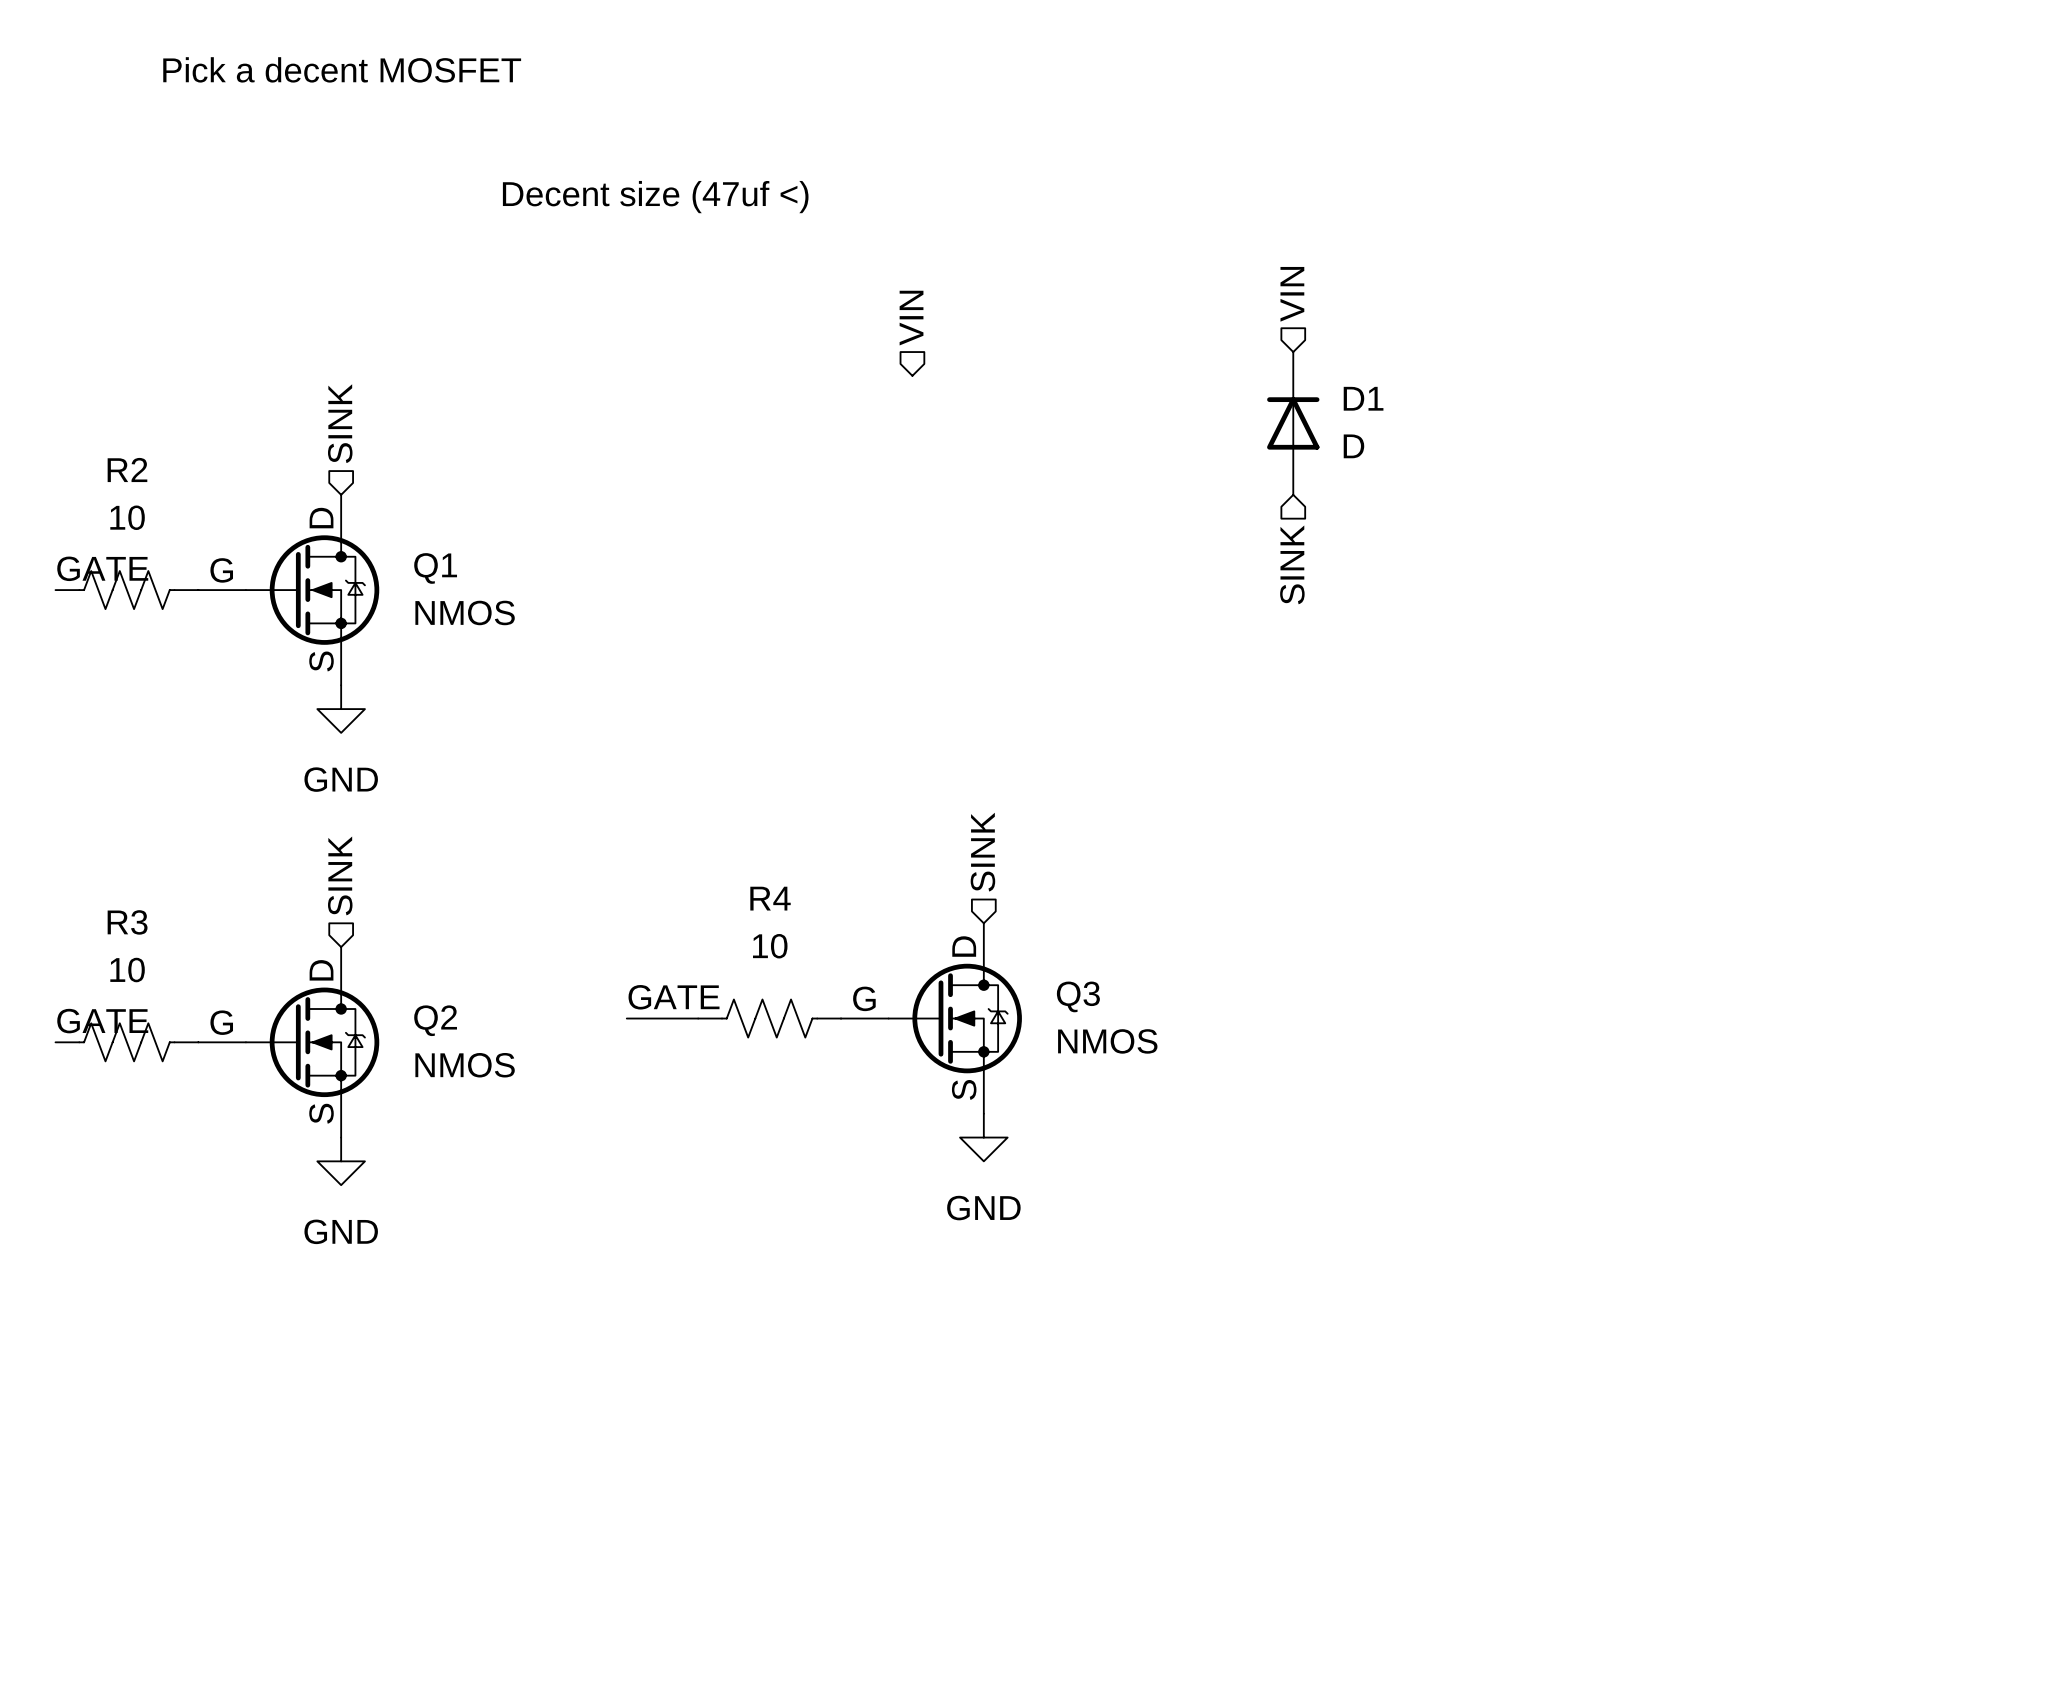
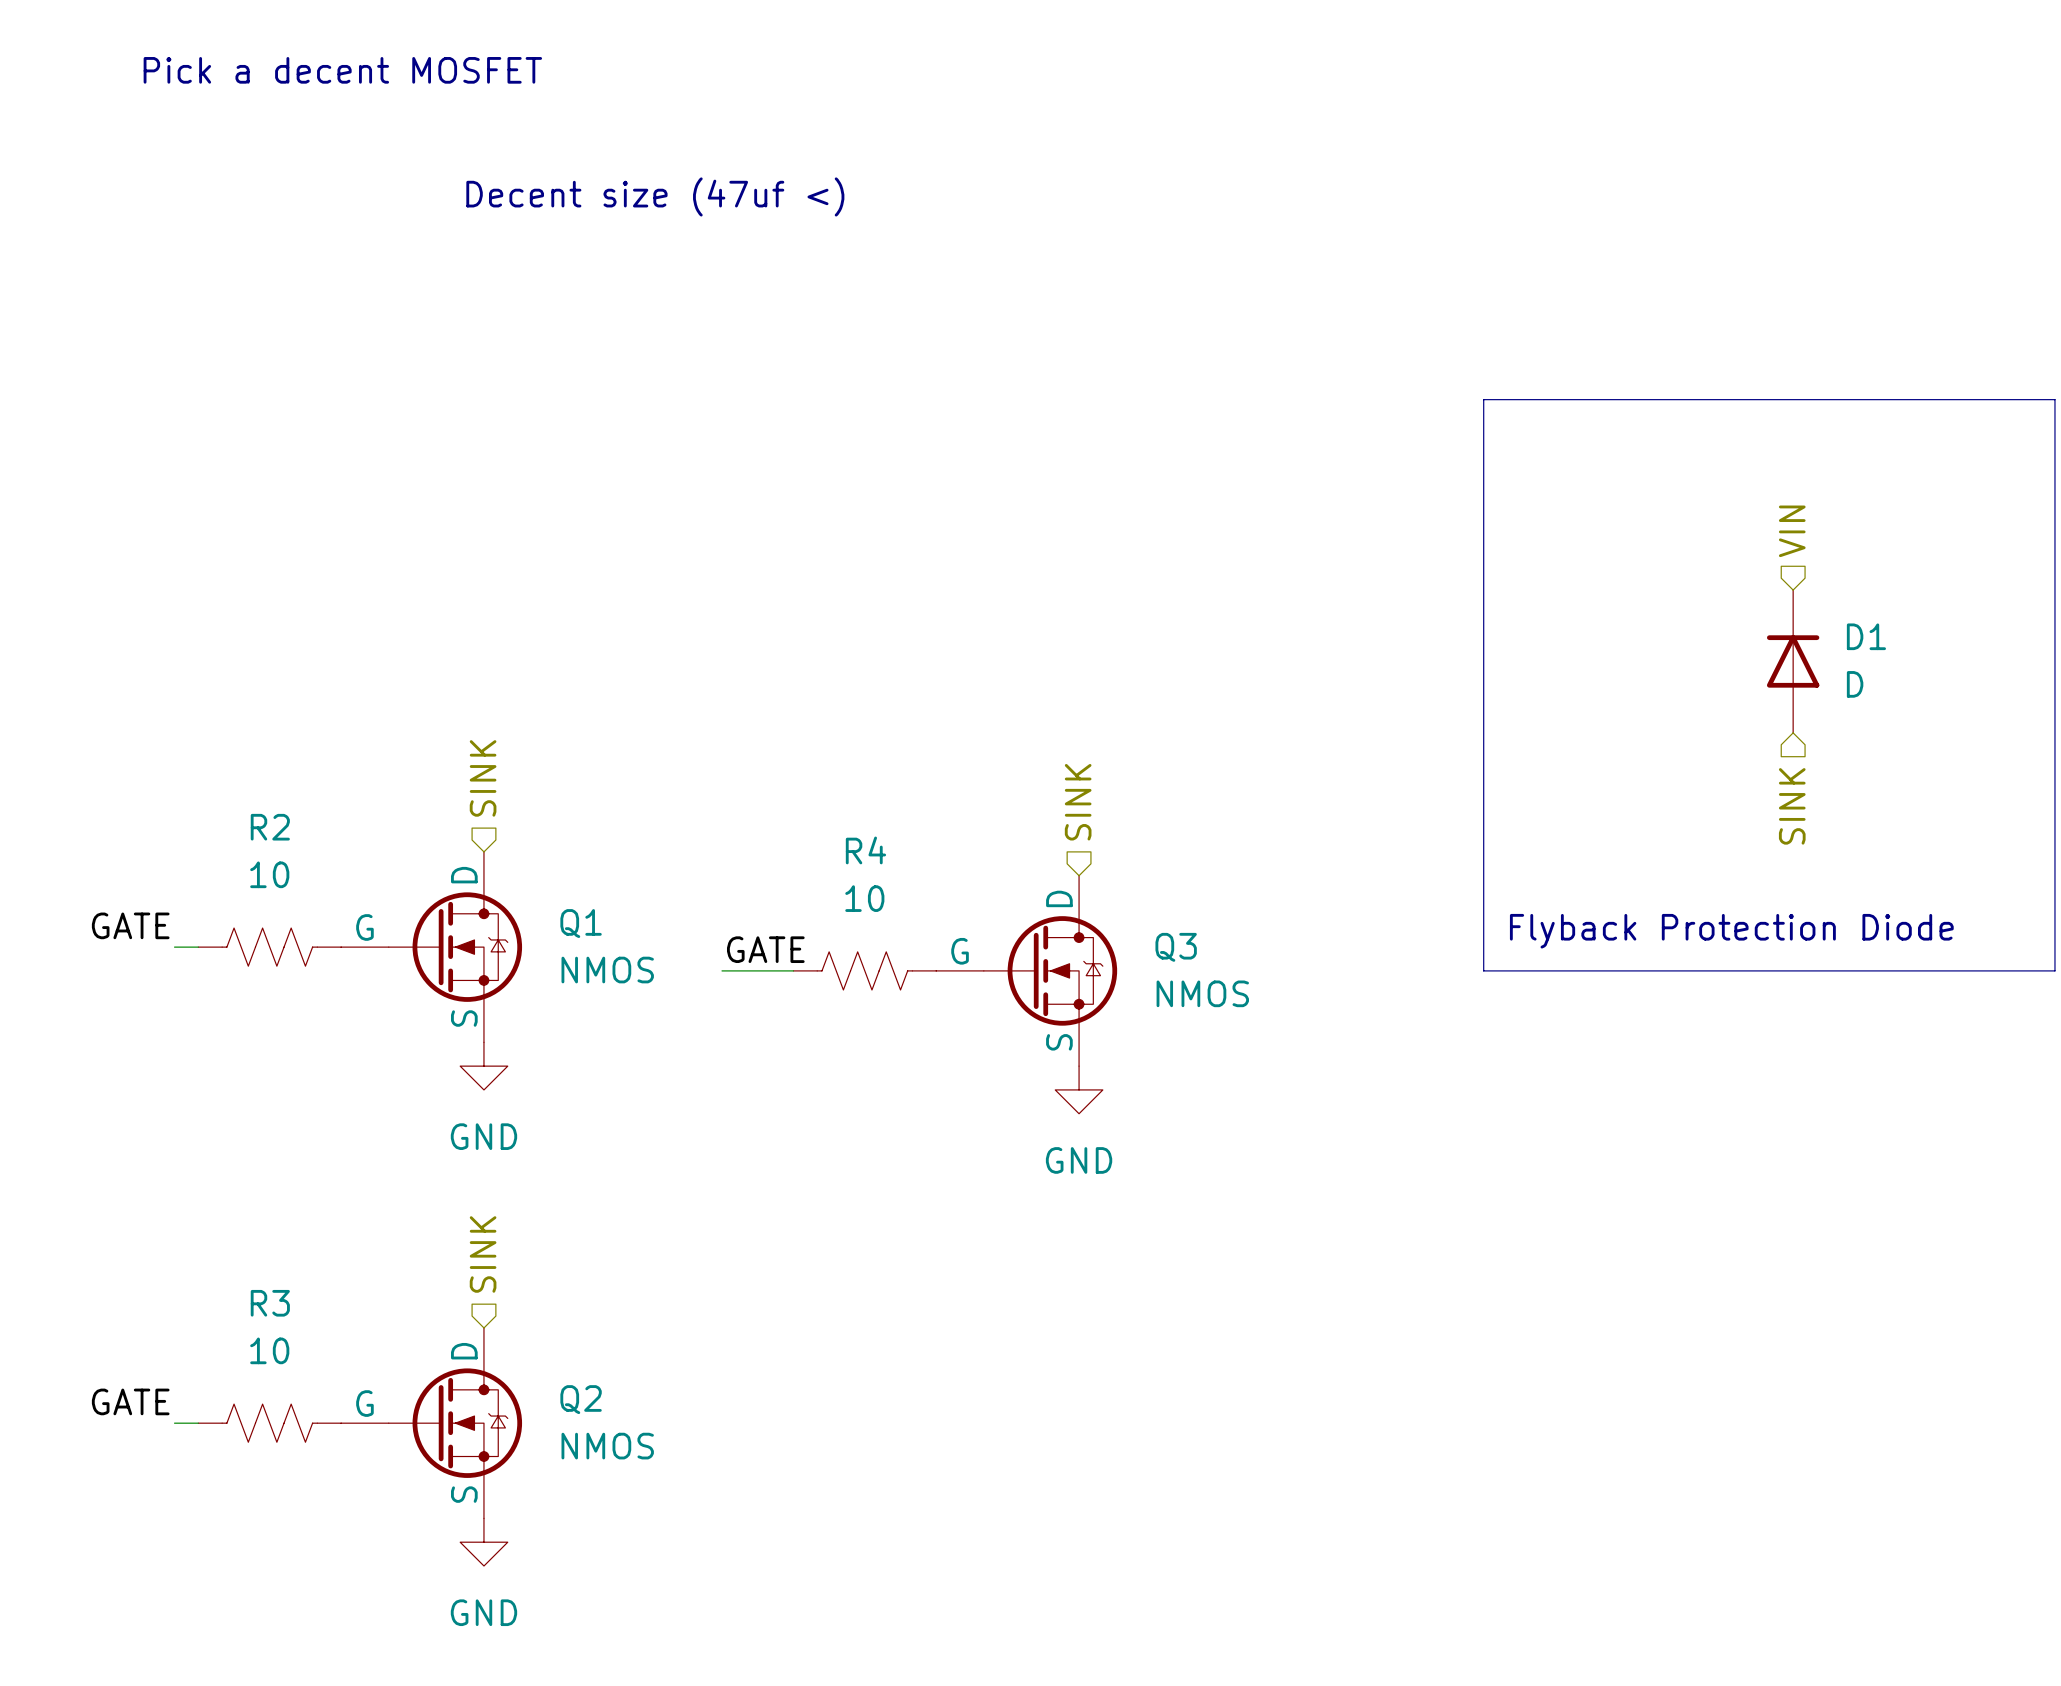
hierarchical label: VIN (1292, 294) -> none
hierarchical label: VIN (911, 318) -> none
line: none -> (1483, 399) (2054, 399) (2054, 970) (1483, 970) (1483, 399)
hierarchical label: SINK (340, 423) -> none
D1 position: (1293, 423) -> (1793, 661)
hierarchical label: none -> VIN (1792, 531)
hierarchical label: SINK (1292, 564) -> none
label: GATE (102, 568) -> none
R2 position: (126, 590) -> (269, 947)
Q1 position: (288, 590) -> (431, 947)
power symbol: GND (341, 709) -> none
hierarchical label: none -> SINK (1792, 806)
hierarchical label position: SINK (982, 852) -> SINK (1078, 802)
hierarchical label position: SINK (340, 875) -> SINK (483, 778)
text: none -> Flyback Protection Diode (1731, 931)
wire: none -> (174, 947) (198, 947)
label position: GATE (674, 997) -> GATE (765, 949)
wire: (626, 1018) (698, 1018) -> (722, 970) (793, 970)
R4 position: (769, 1018) -> (864, 970)
Q3 position: (931, 1018) -> (1026, 970)
label position: GATE (102, 1021) -> GATE (130, 925)
R3 position: (126, 1042) -> (269, 1423)
Q2 position: (288, 1042) -> (431, 1423)
power symbol position: GND (983, 1137) -> GND (1079, 1089)
power symbol position: GND (341, 1161) -> GND (483, 1066)
hierarchical label: none -> SINK (483, 1254)
label: none -> GATE (130, 1401)
wire: none -> (174, 1423) (198, 1423)
power symbol: none -> GND (483, 1542)

